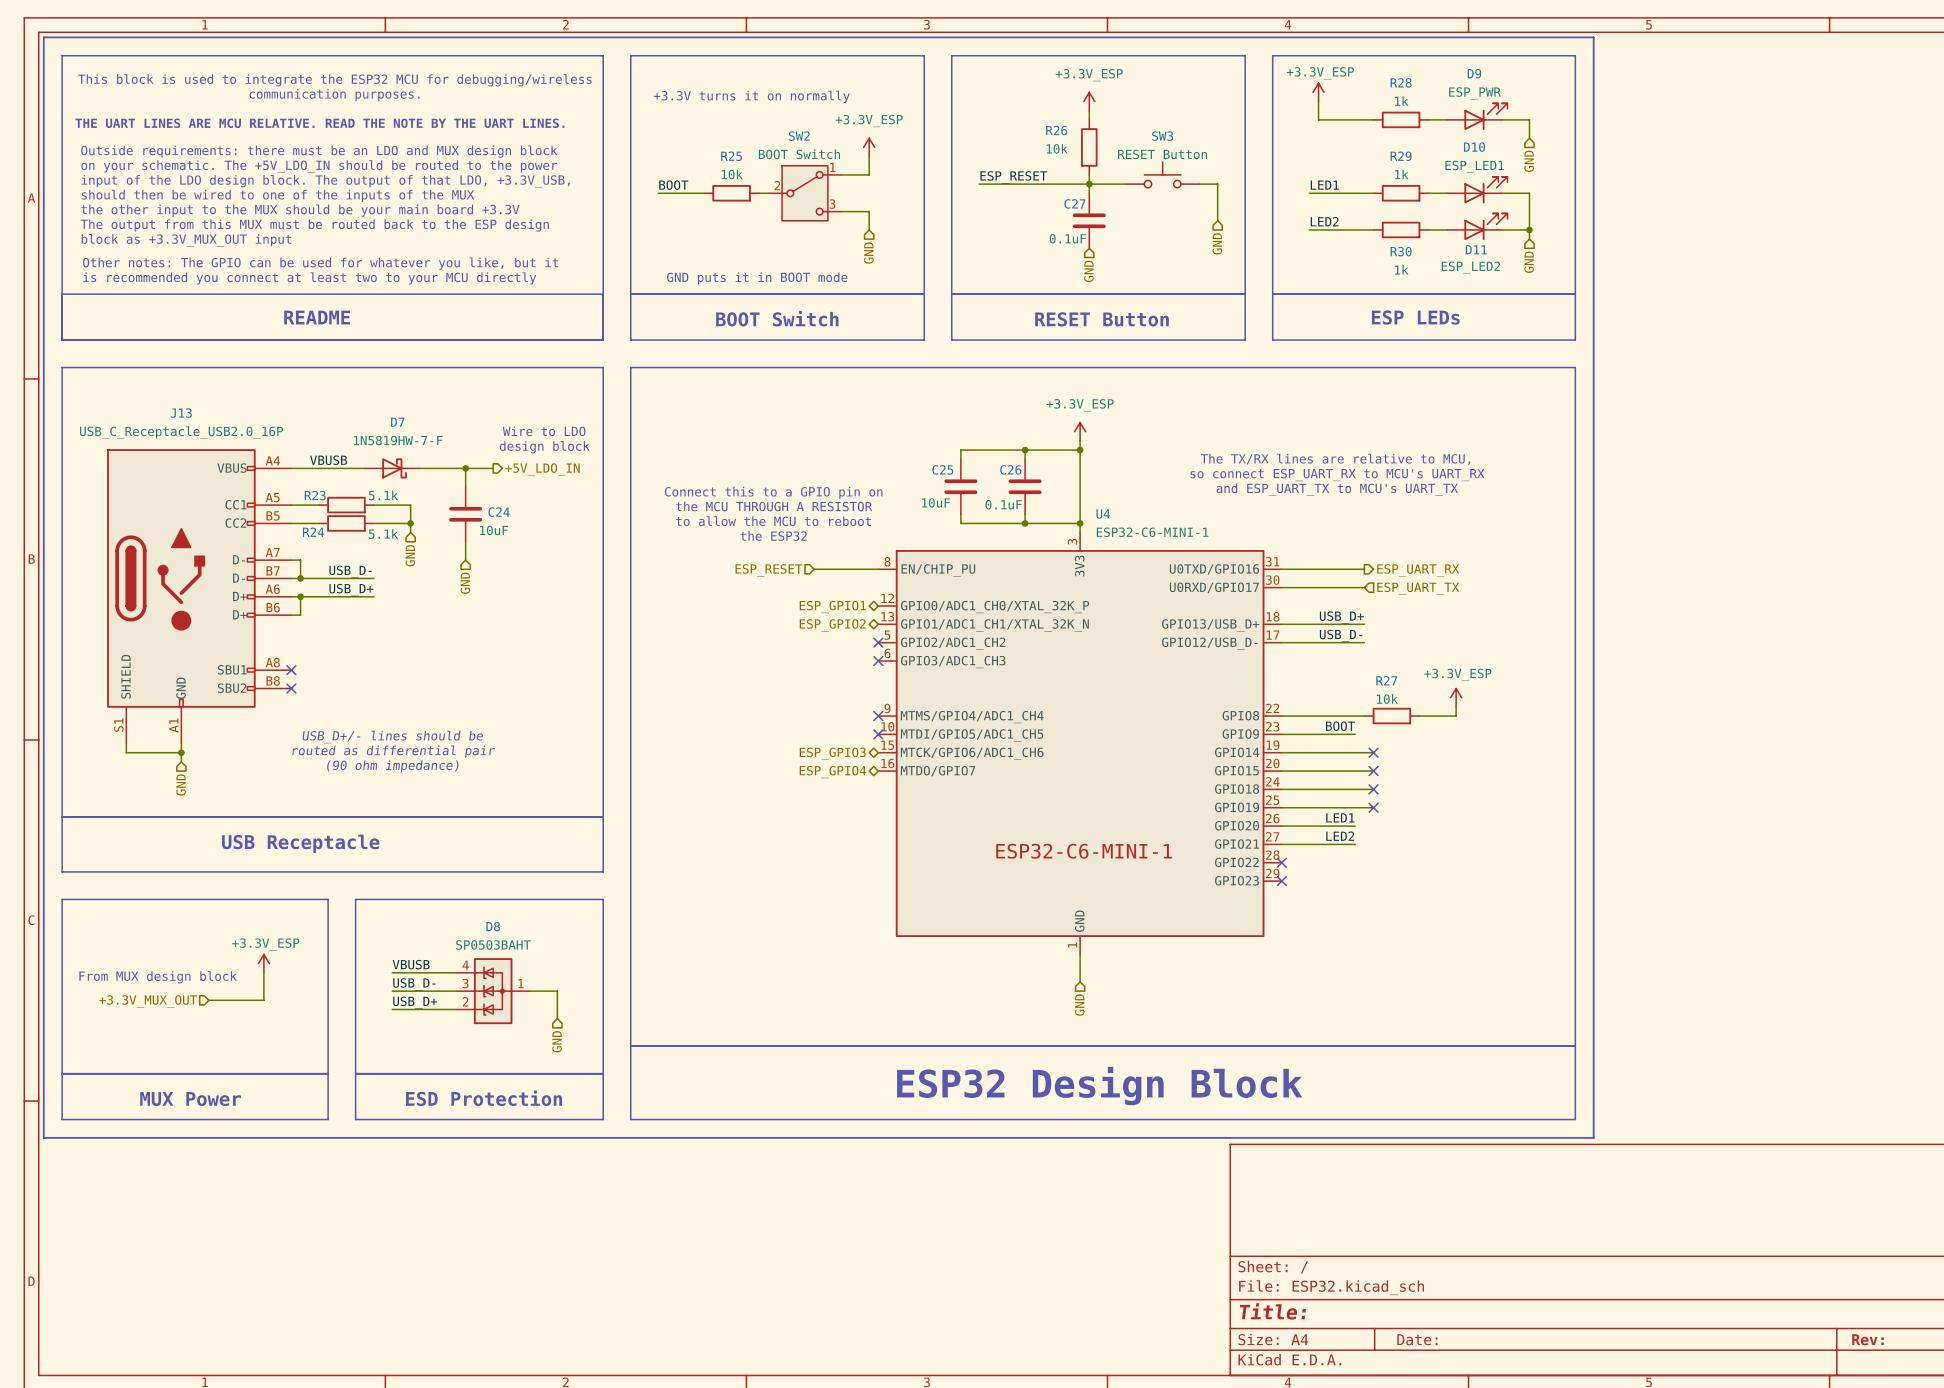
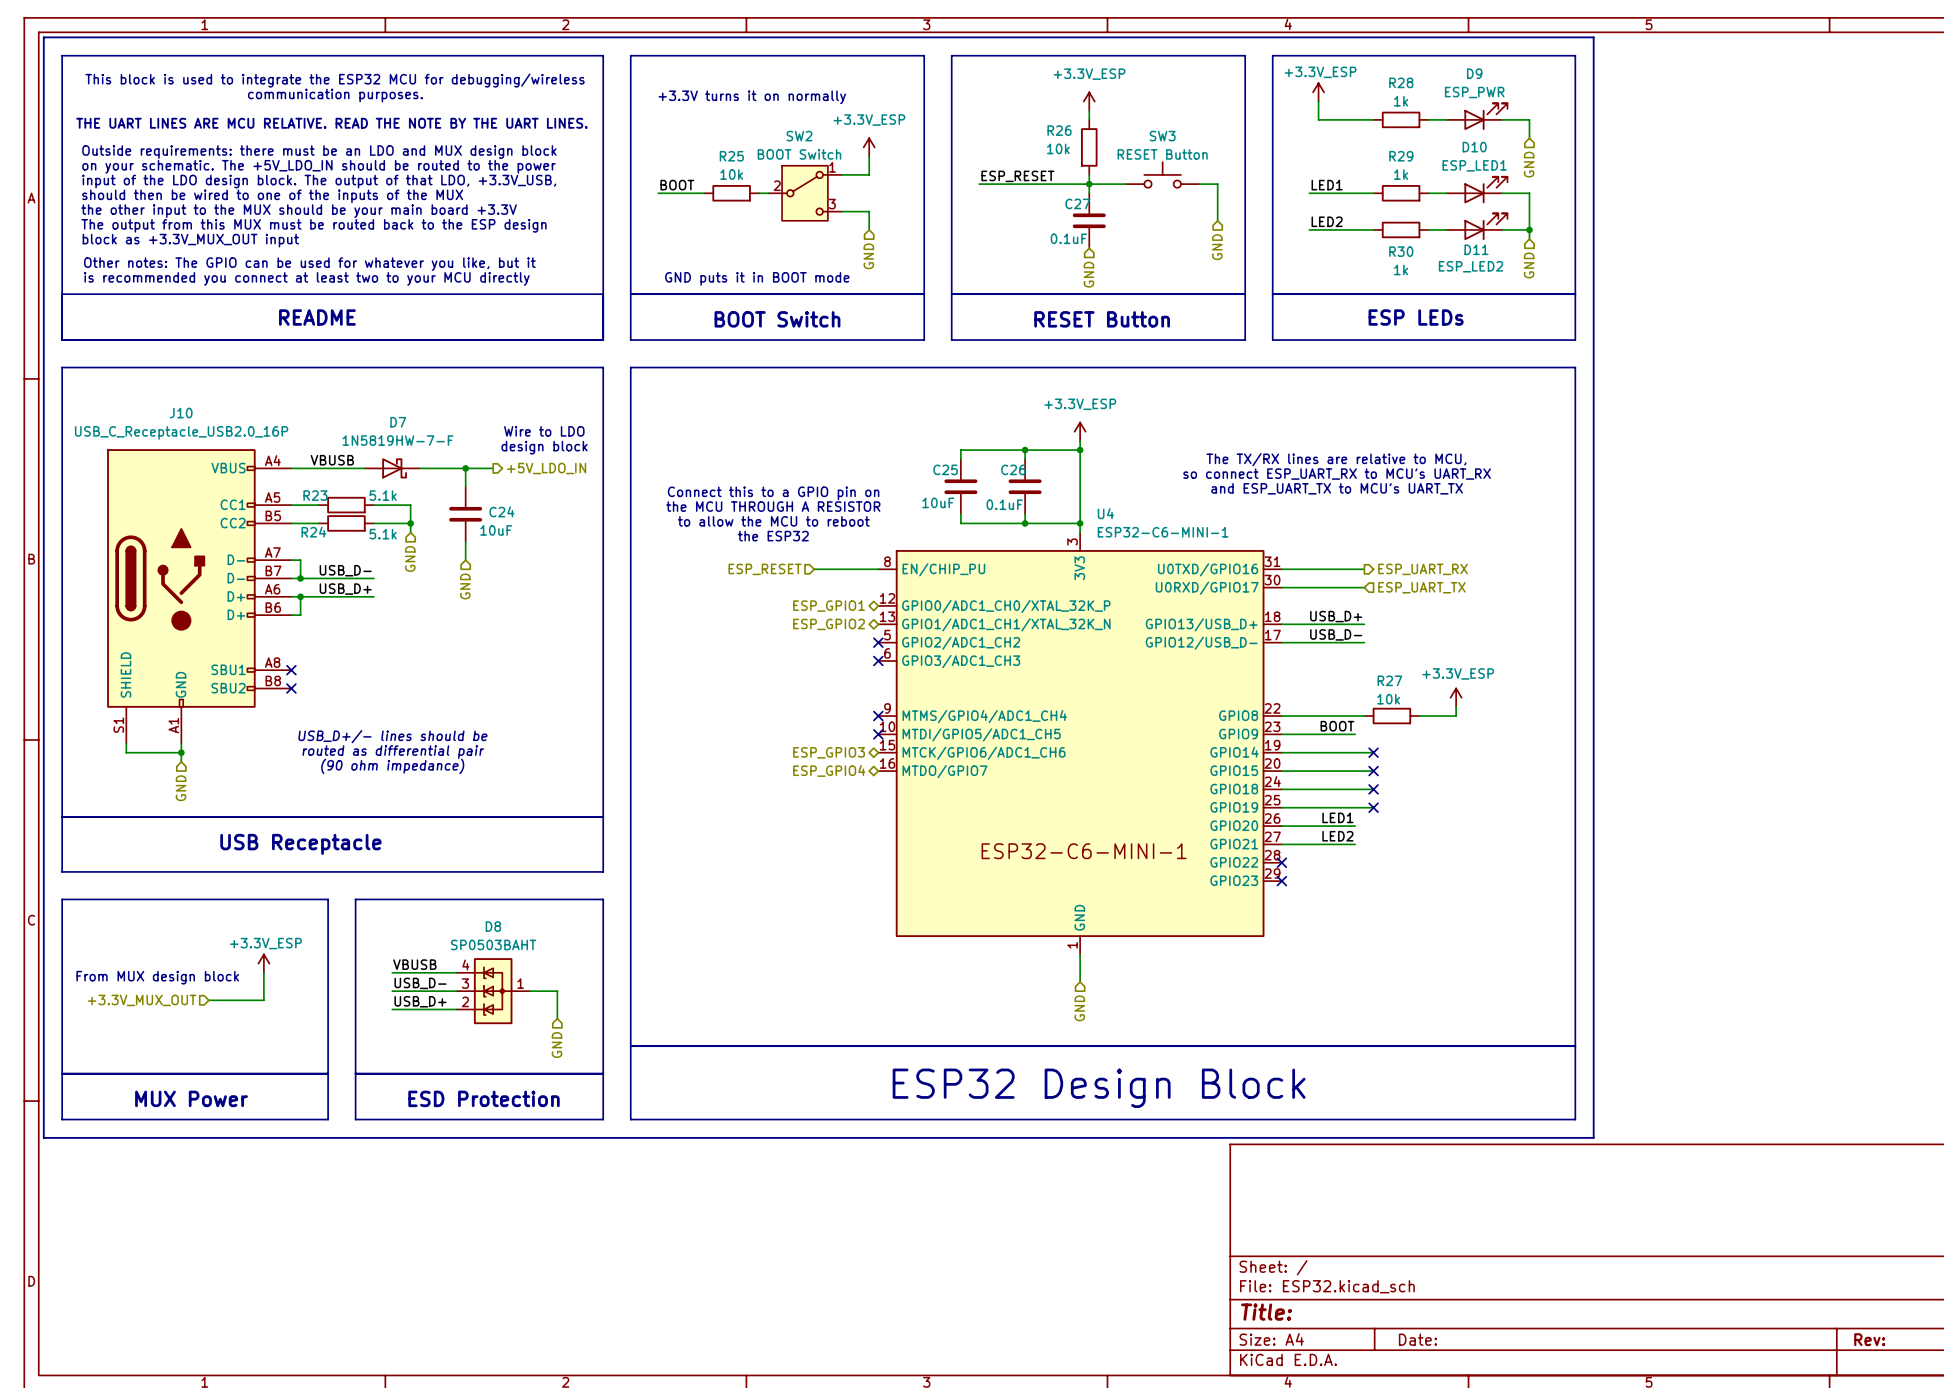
J13 name: J13 (181, 413) -> J10 (181, 413)

